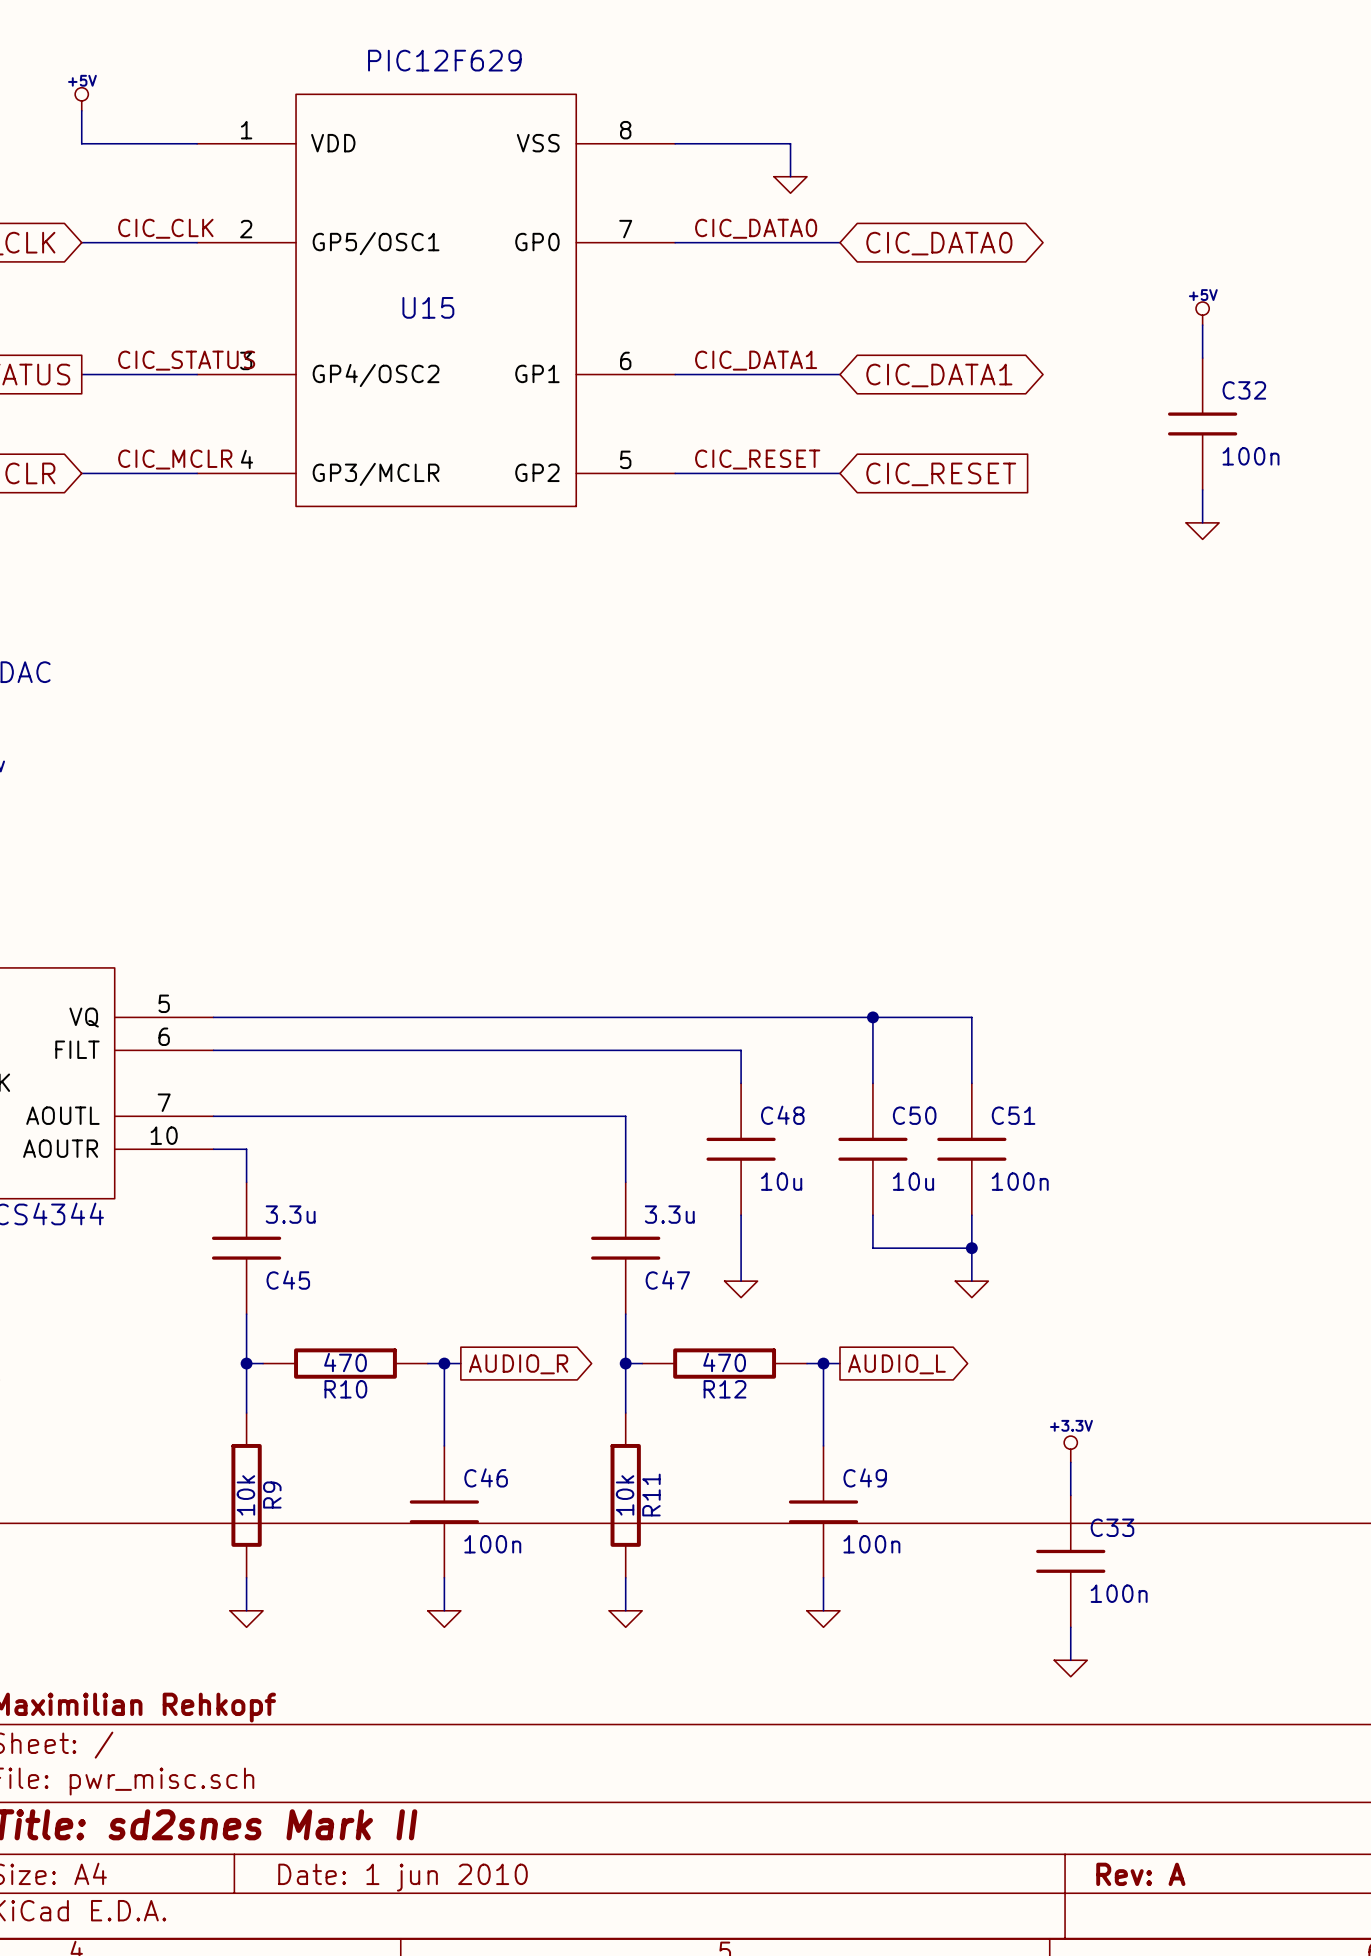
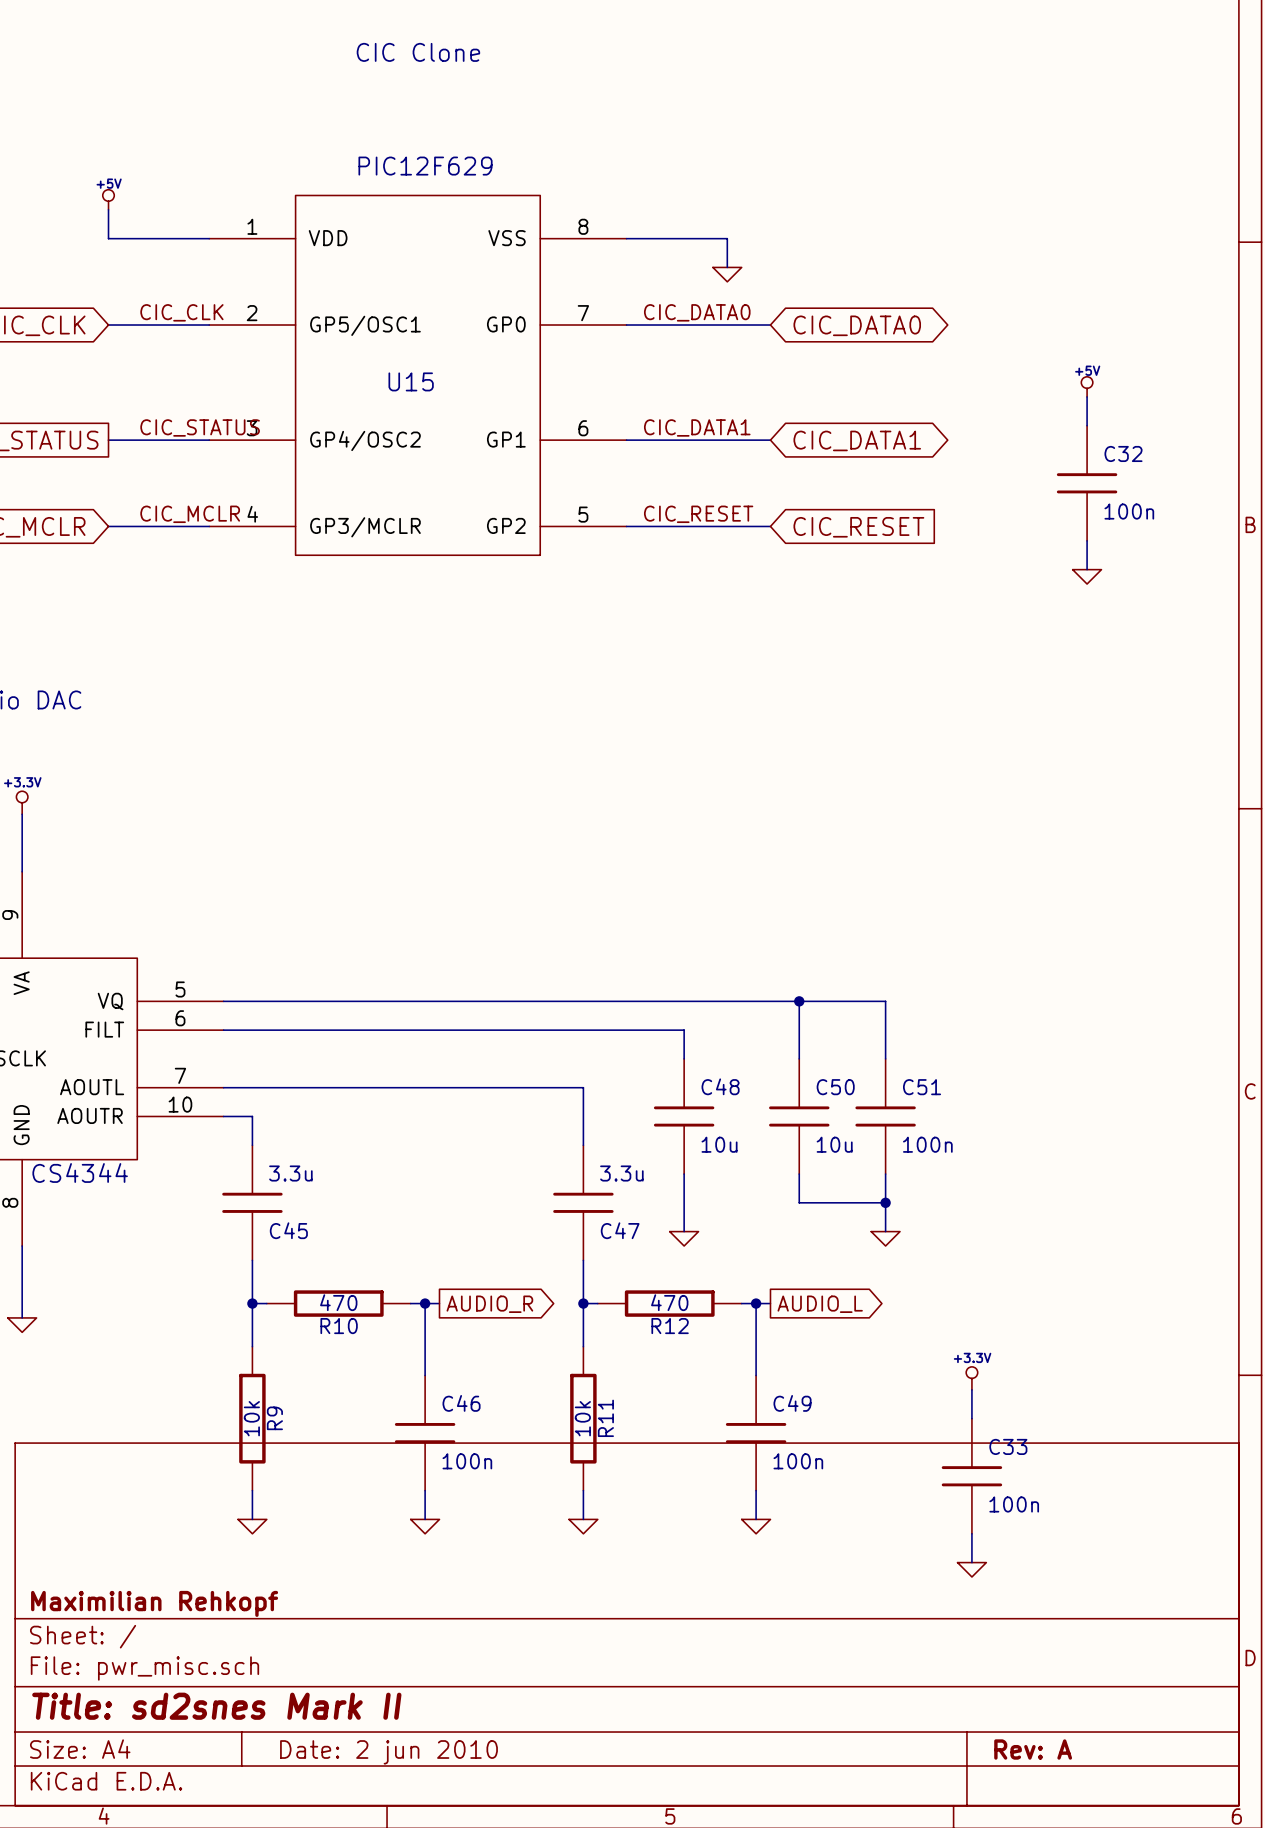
title block: Date: 1 jun 2010 (403, 1877) -> Date: 2 jun 2010 (388, 1752)

